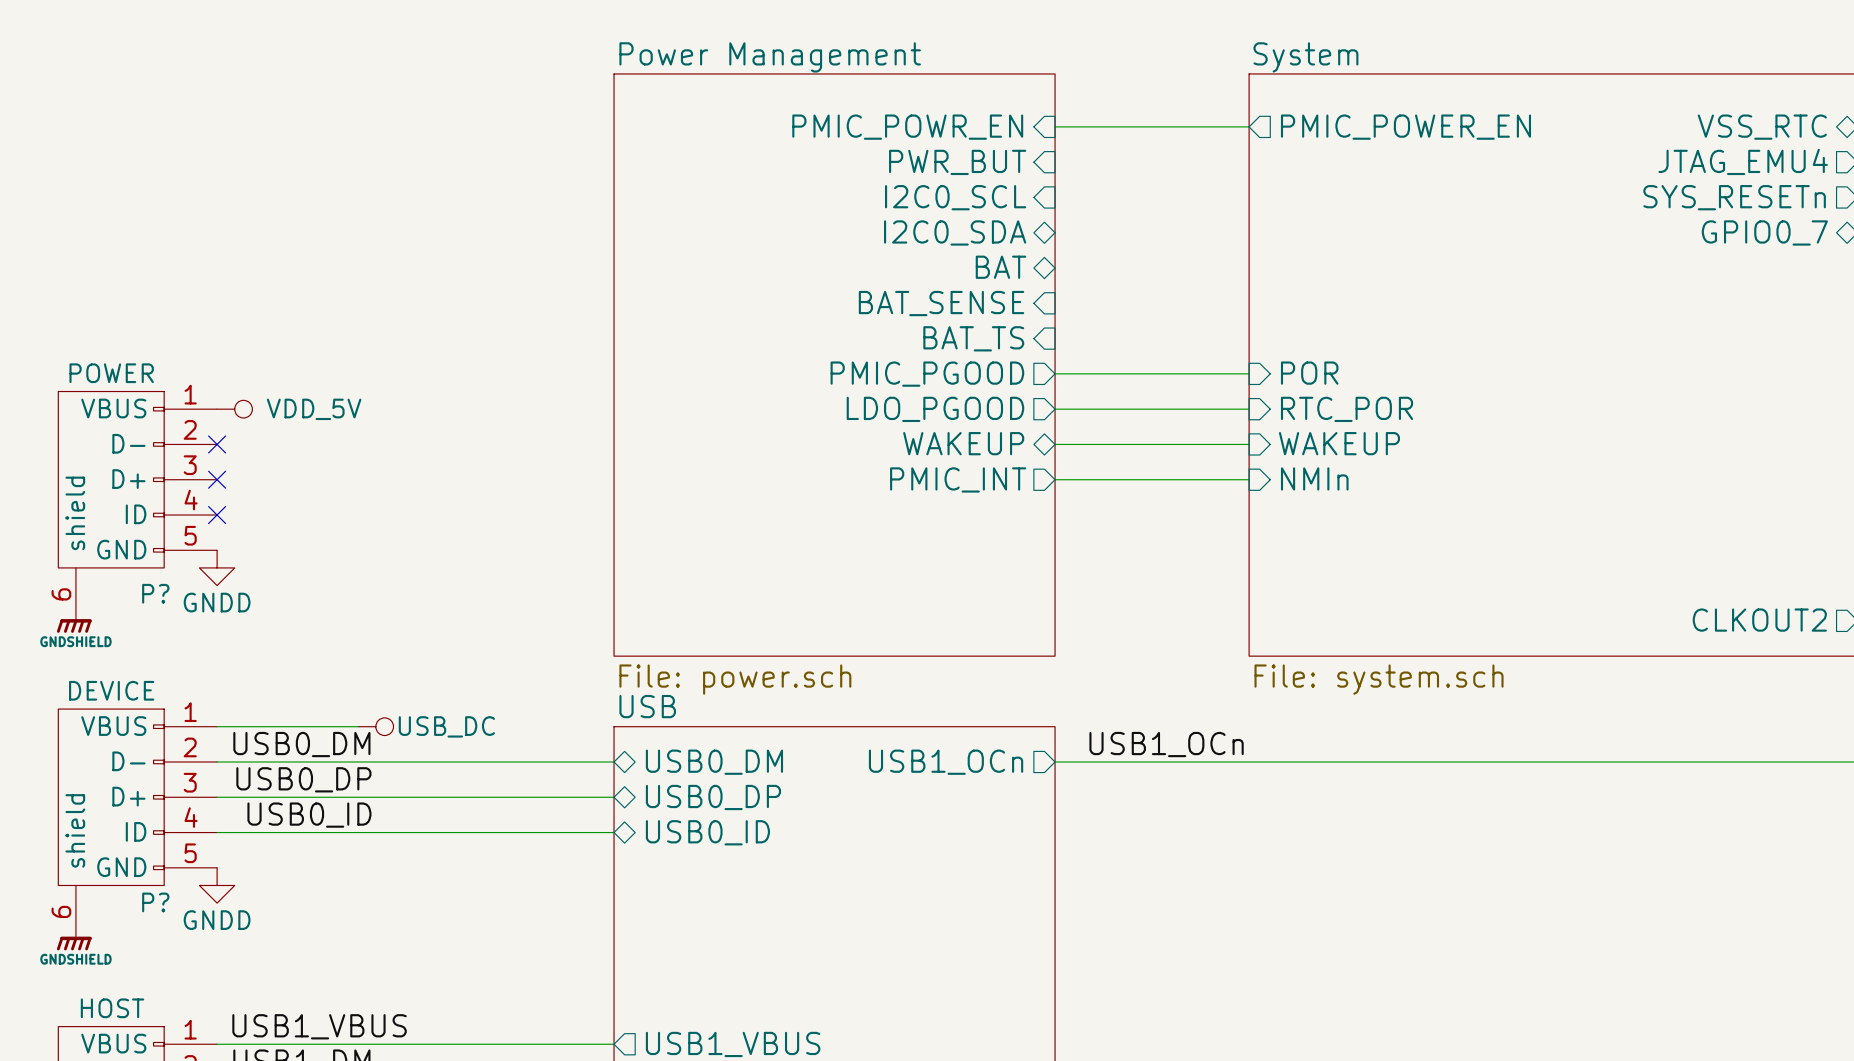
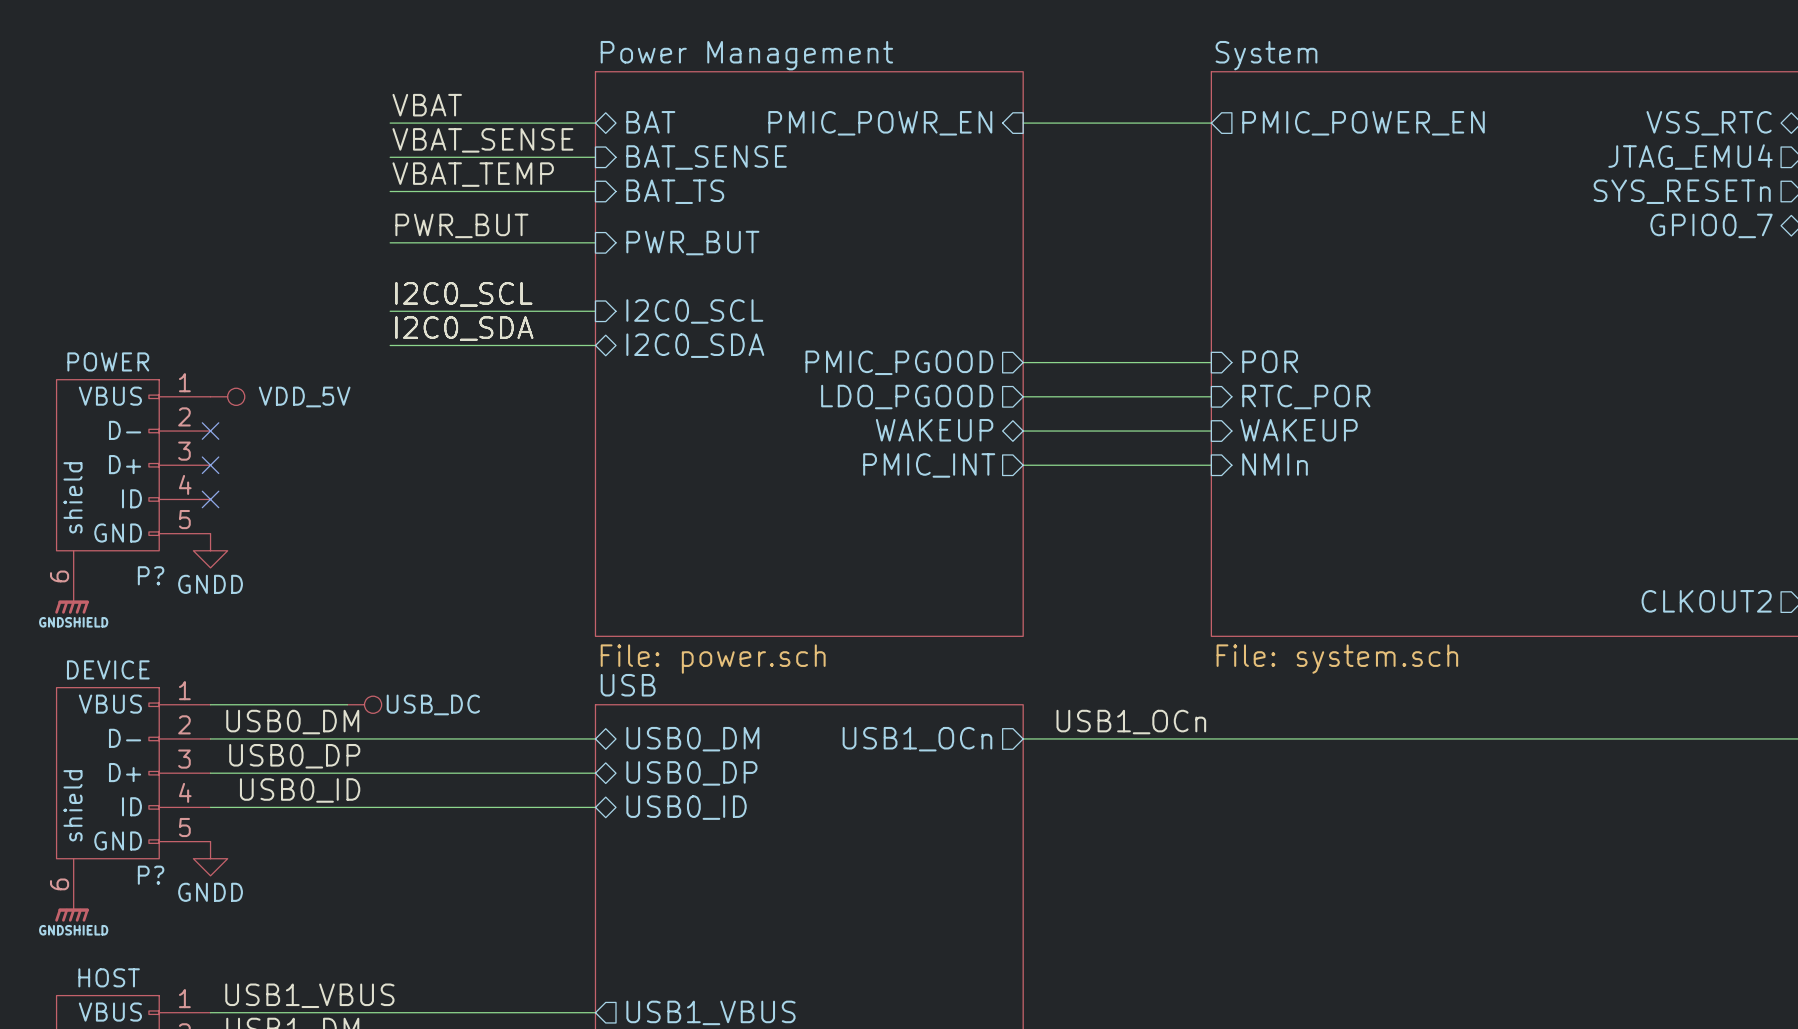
label: none -> VBAT (427, 105)
wire: none -> (390, 123) (595, 123)
sheet pin: none -> BAT (650, 122)
label: none -> VBAT_SENSE (482, 140)
wire: none -> (390, 157) (595, 157)
sheet pin: none -> BAT_SENSE (706, 157)
sheet pin: PWR_BUT (957, 162) -> none
label: none -> VBAT_TEMP (473, 174)
wire: none -> (390, 191) (595, 191)
sheet pin: none -> BAT_TS (675, 191)
sheet pin: I2C0_SCL (955, 197) -> none
label: none -> PWR_BUT (461, 225)
sheet pin: I2C0_SDA (955, 232) -> none
wire: none -> (390, 242) (595, 242)
sheet pin: none -> PWR_BUT (692, 243)
sheet pin: BAT (1000, 267) -> none
label: none -> I2C0_SCL (463, 294)
sheet pin: BAT_SENSE (941, 303) -> none
wire: none -> (390, 311) (595, 311)
sheet pin: none -> I2C0_SCL (694, 311)
label: none -> I2C0_SDA (464, 328)
sheet pin: BAT_TS (973, 338) -> none
wire: none -> (390, 345) (595, 345)
sheet pin: none -> I2C0_SDA (695, 345)

